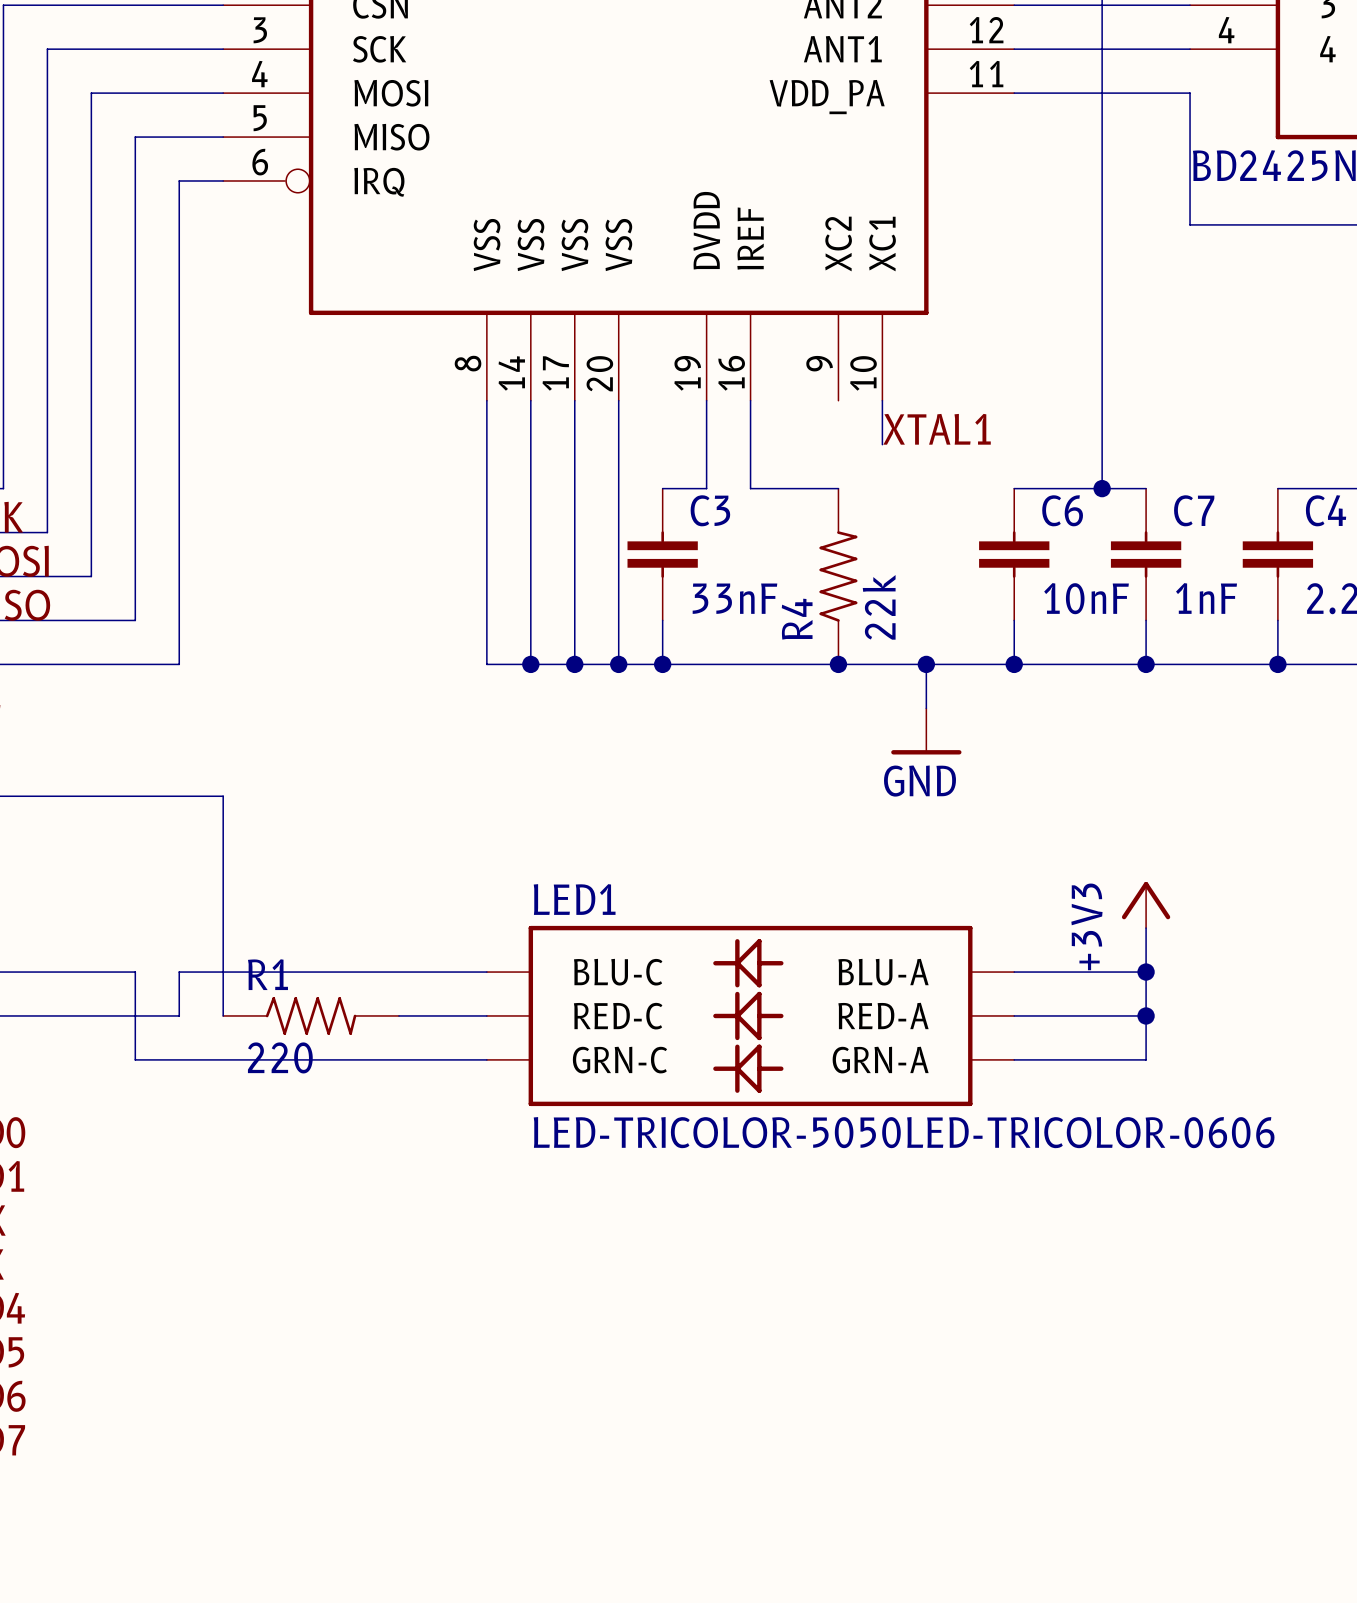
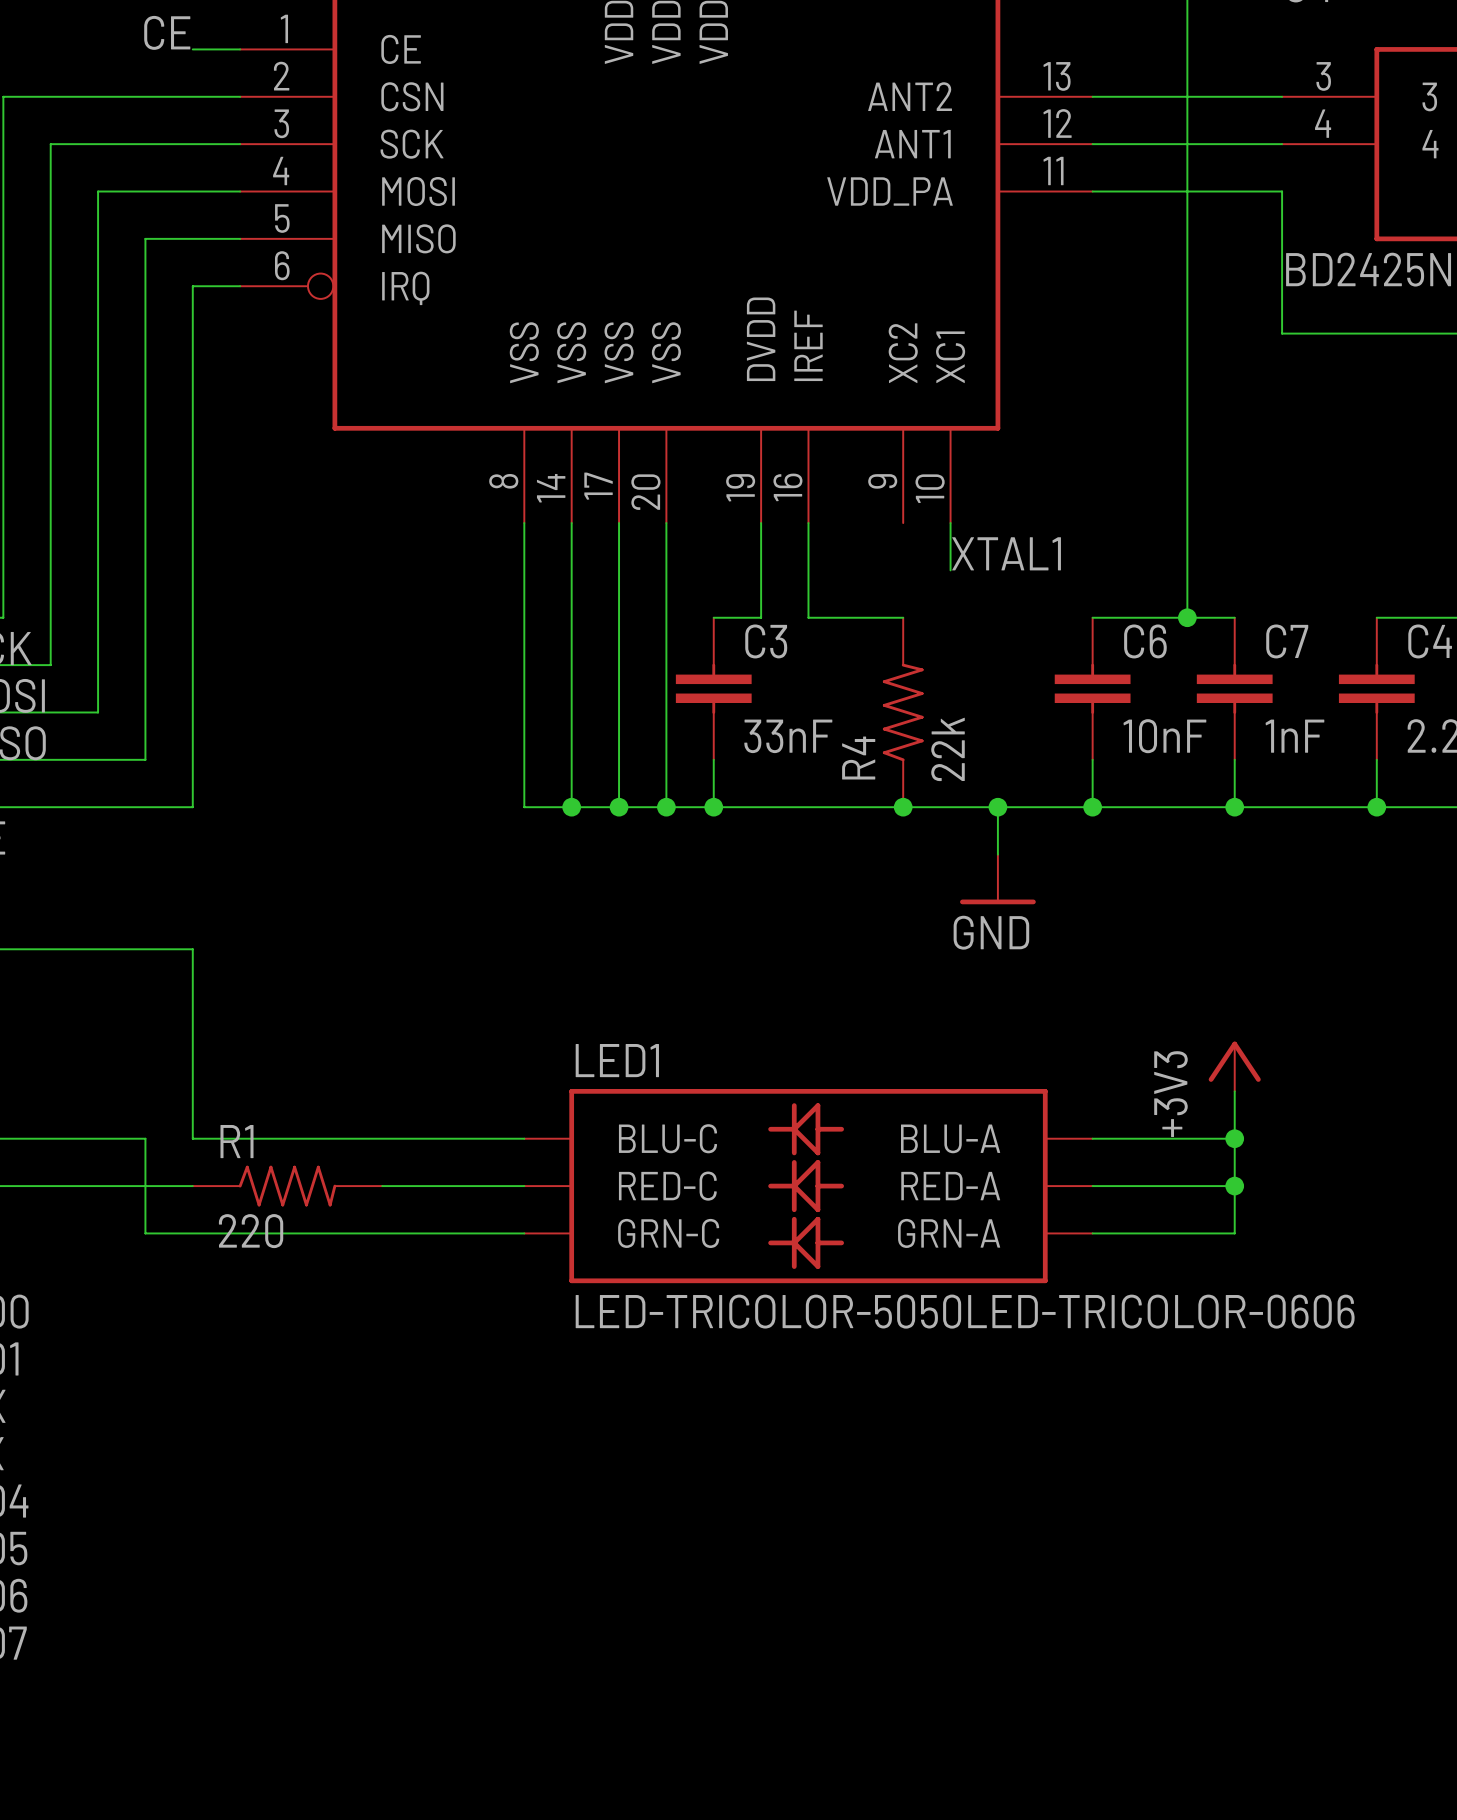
wire: (179, 796) (223, 796) (223, 1015) -> (192, 949) (192, 1138)
wire: (179, 972) (179, 1015) -> none
R1 position: (311, 1015) -> (287, 1186)

